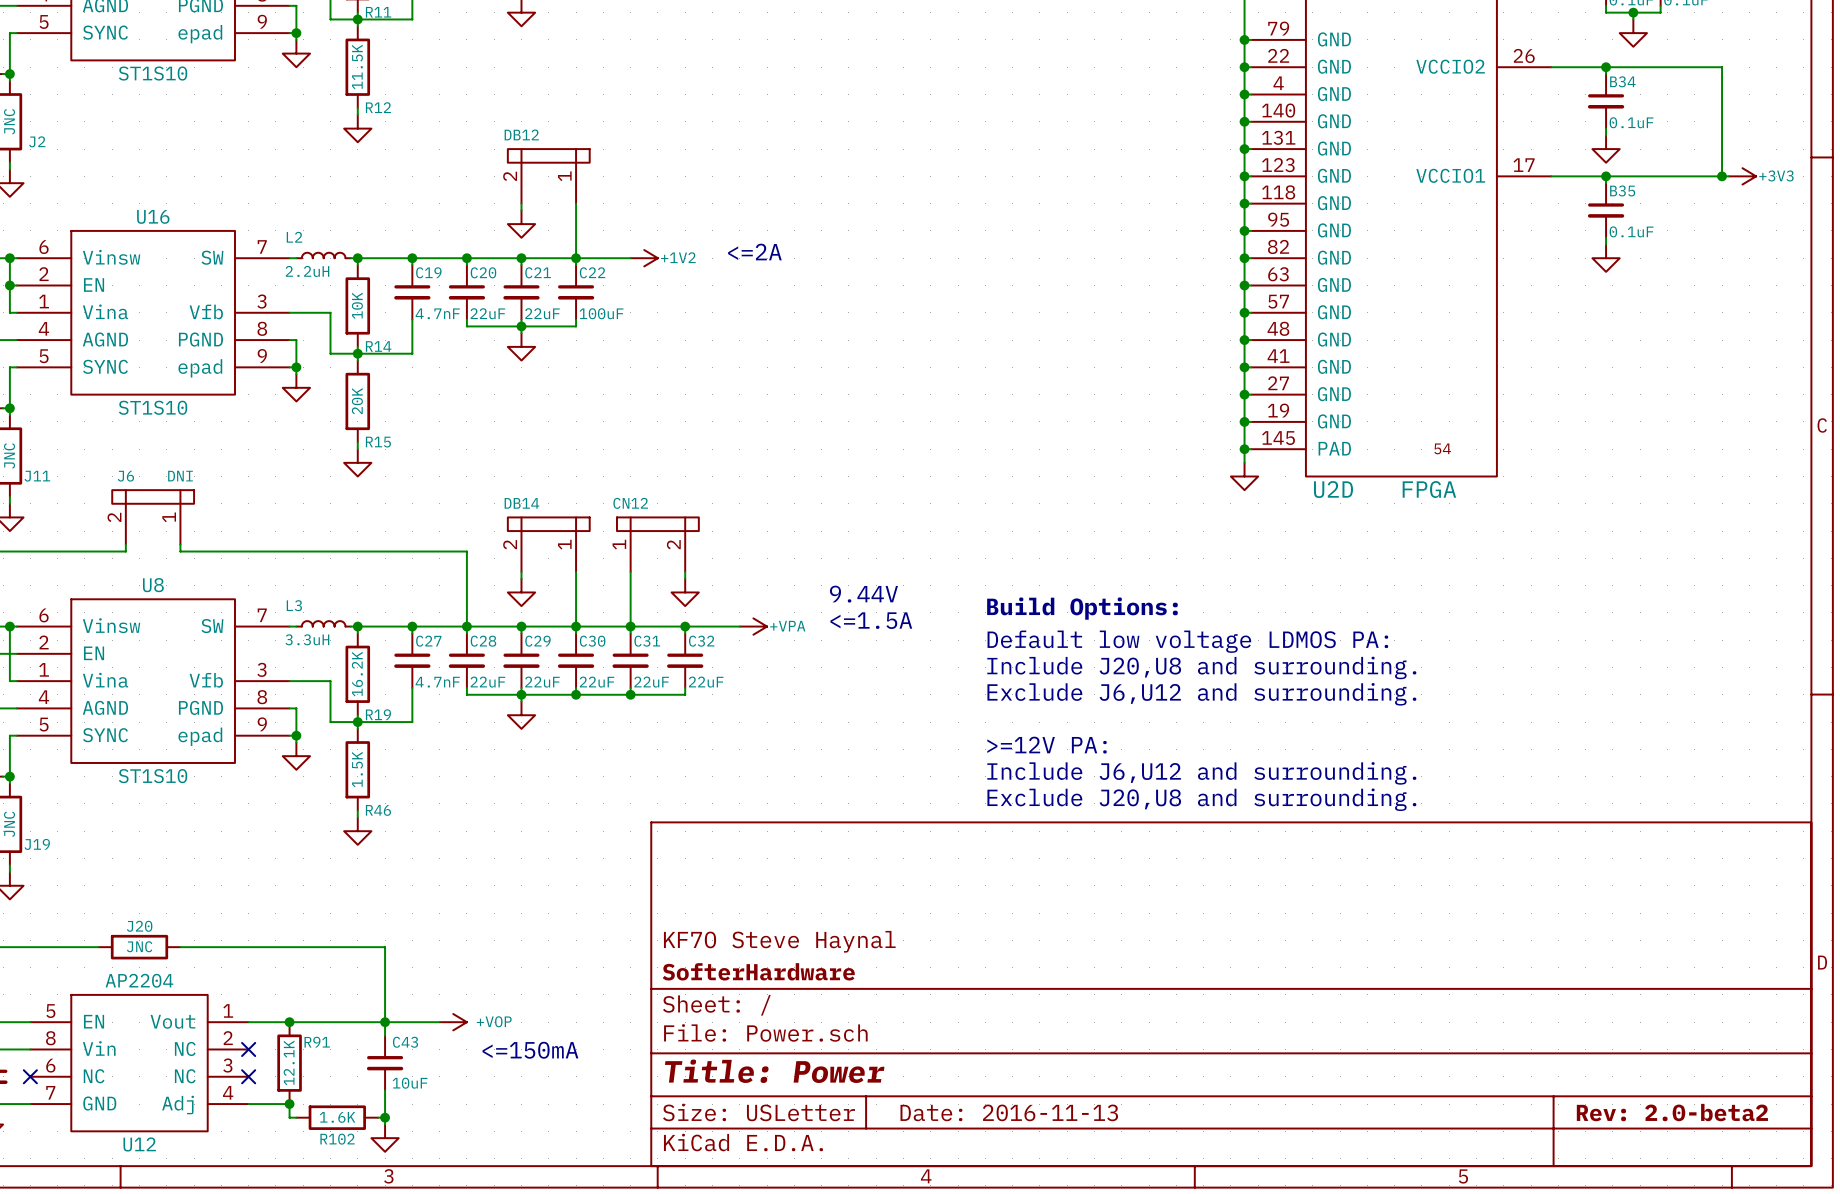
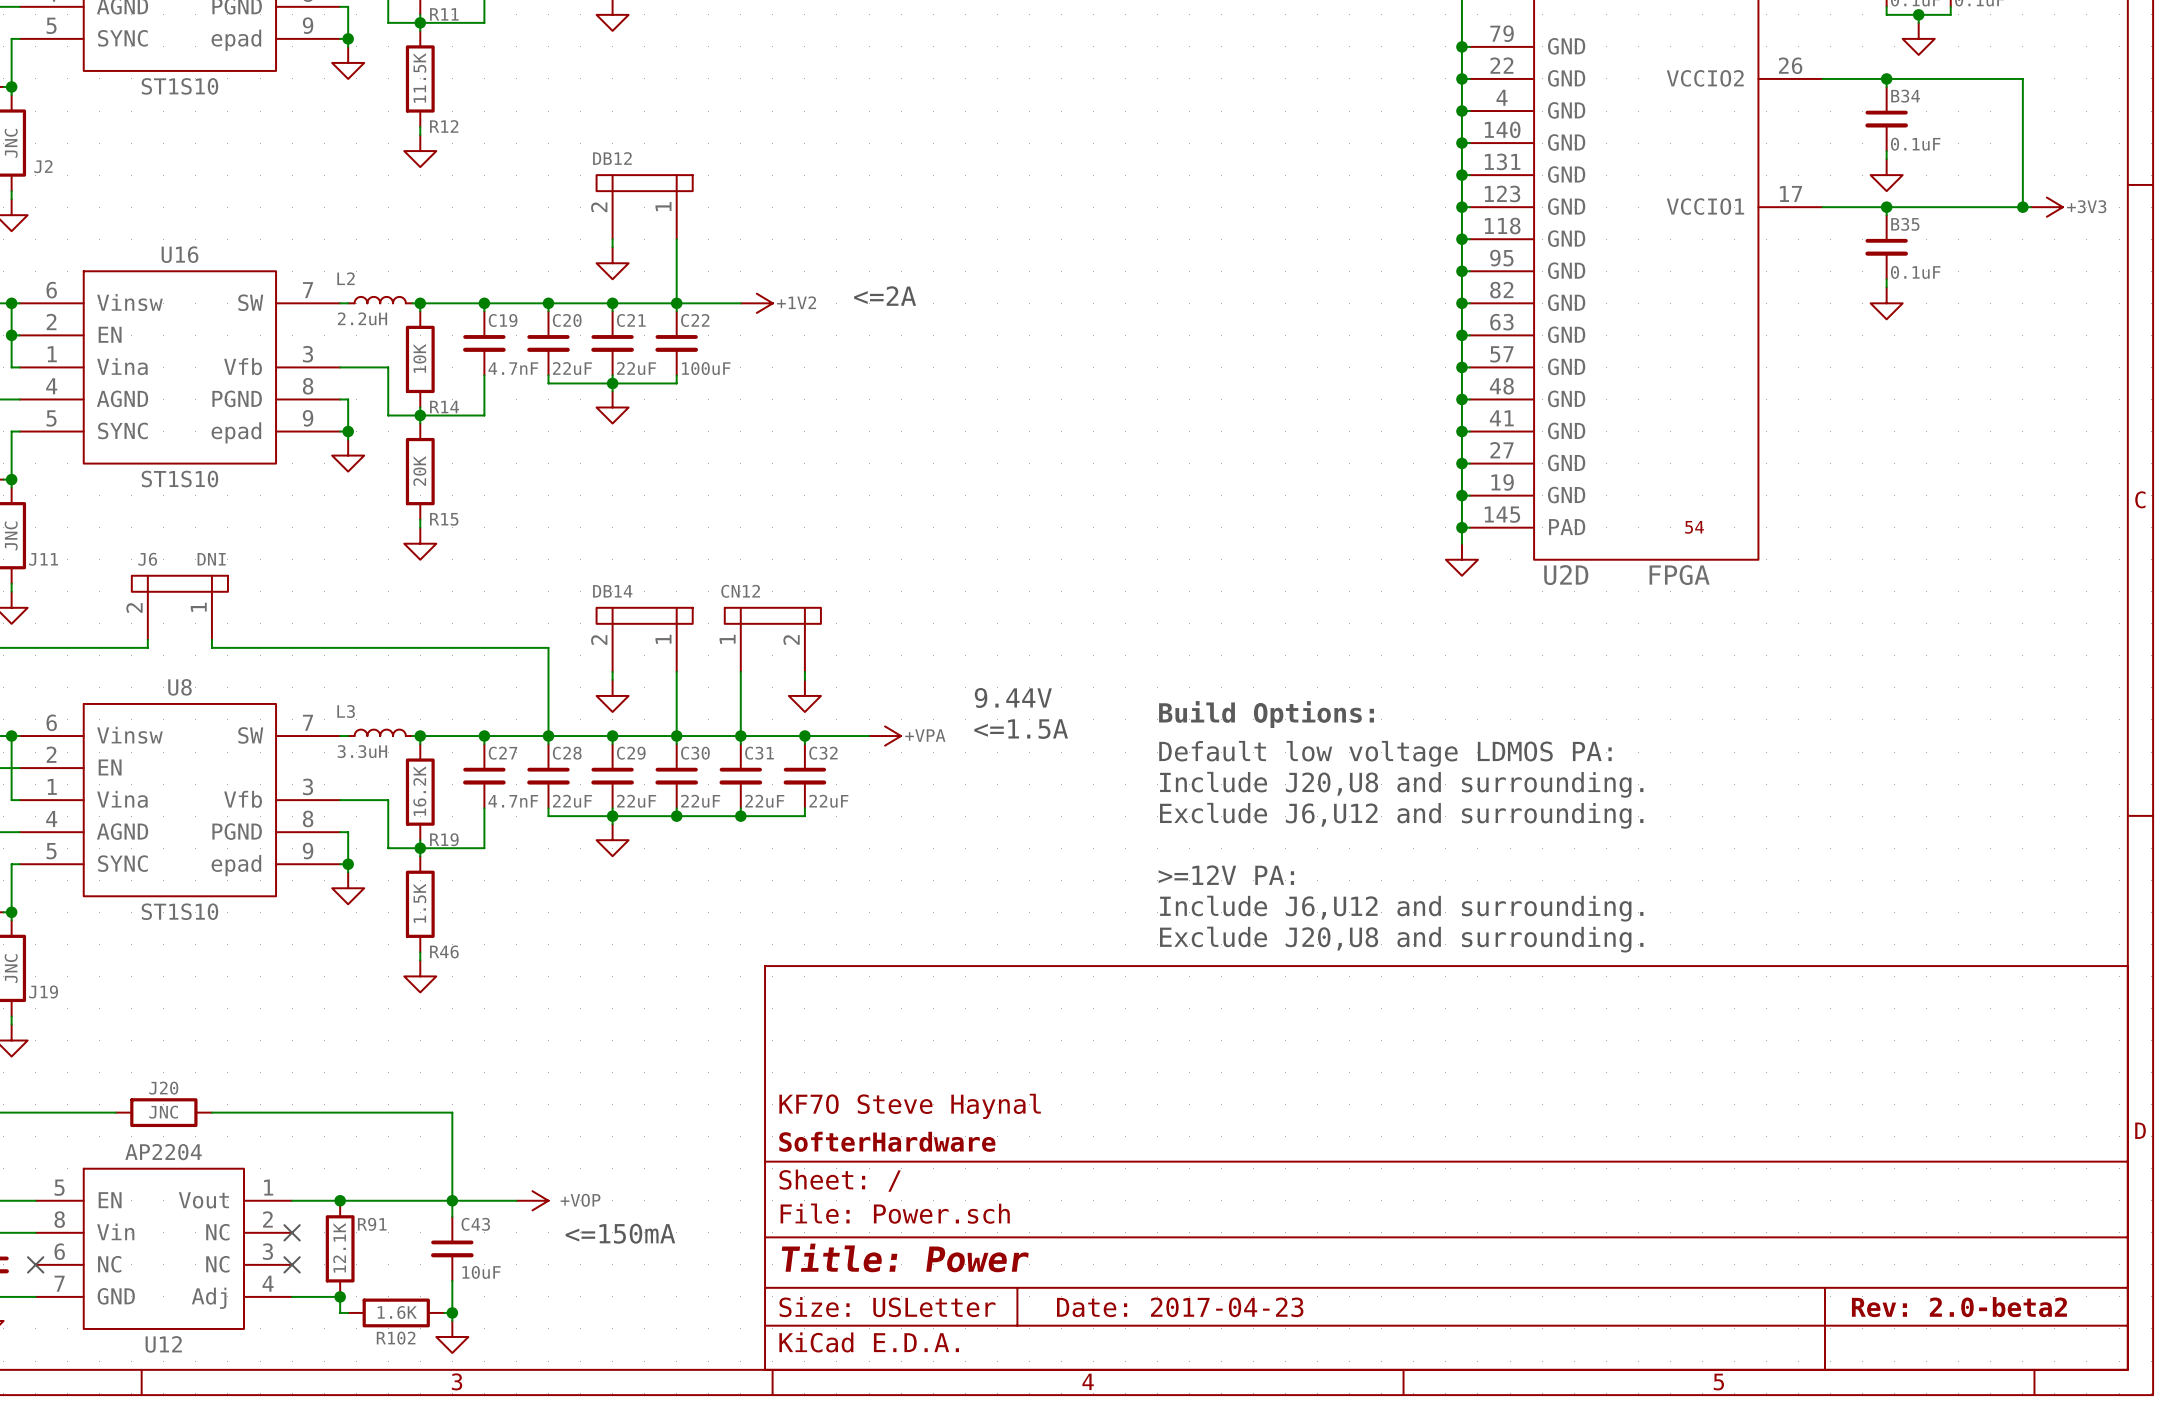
title block: Date: 2016-11-13 (1009, 1112) -> Date: 2017-04-23 (1180, 1307)

